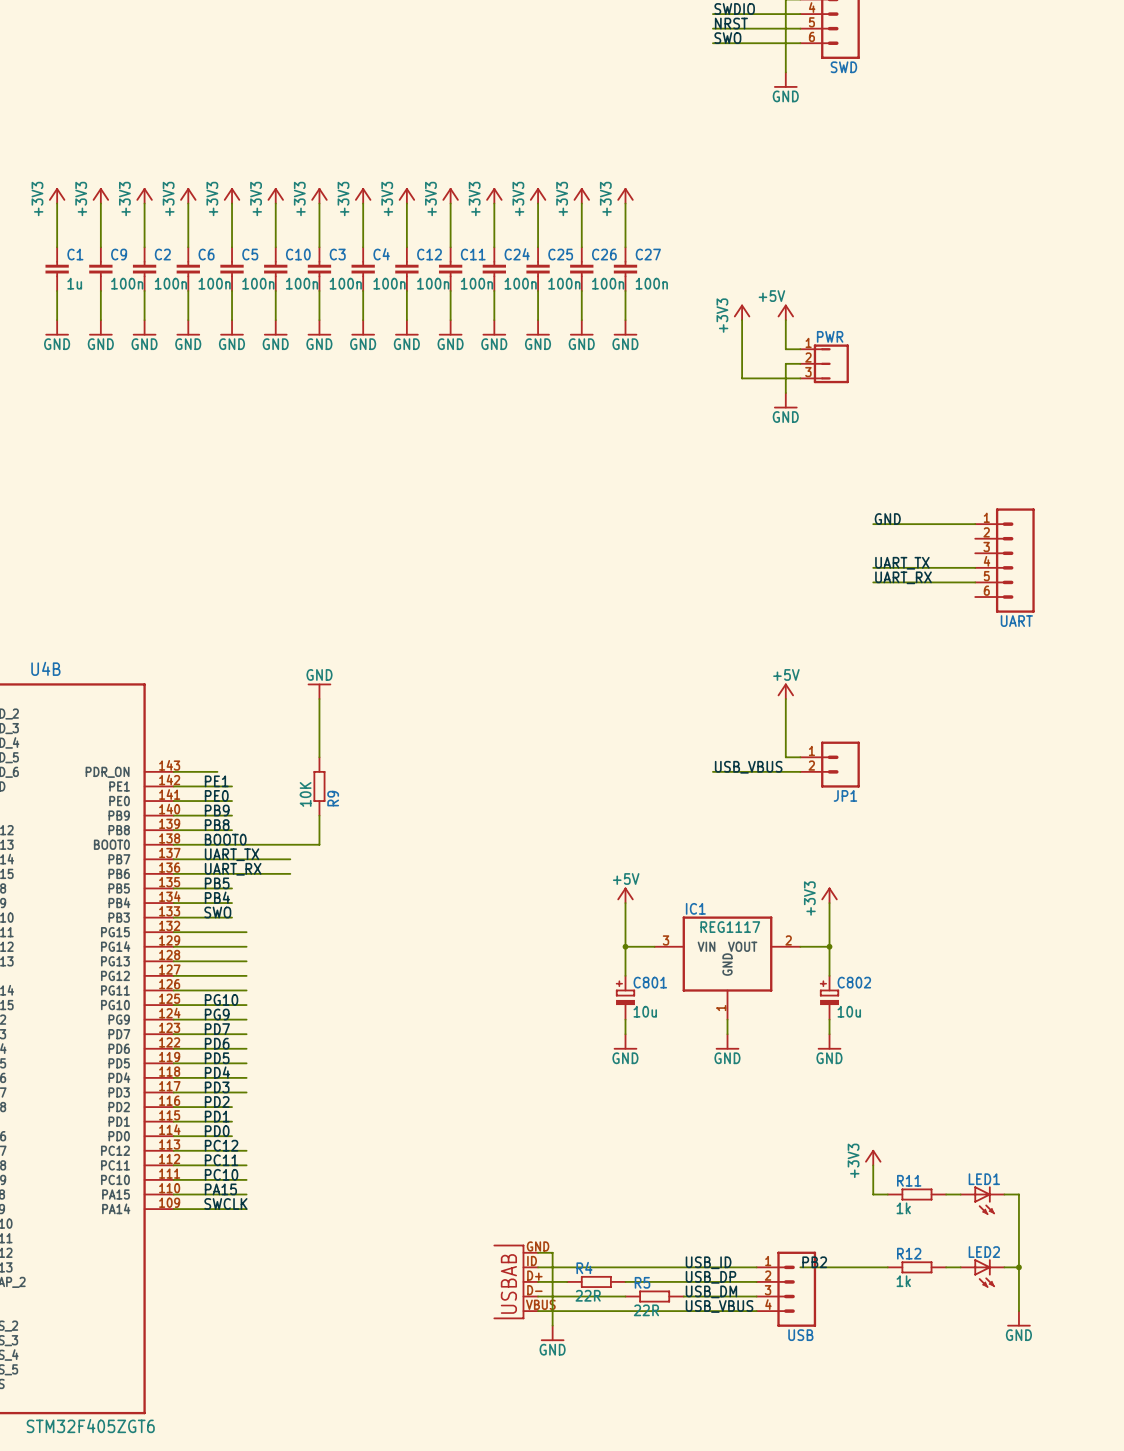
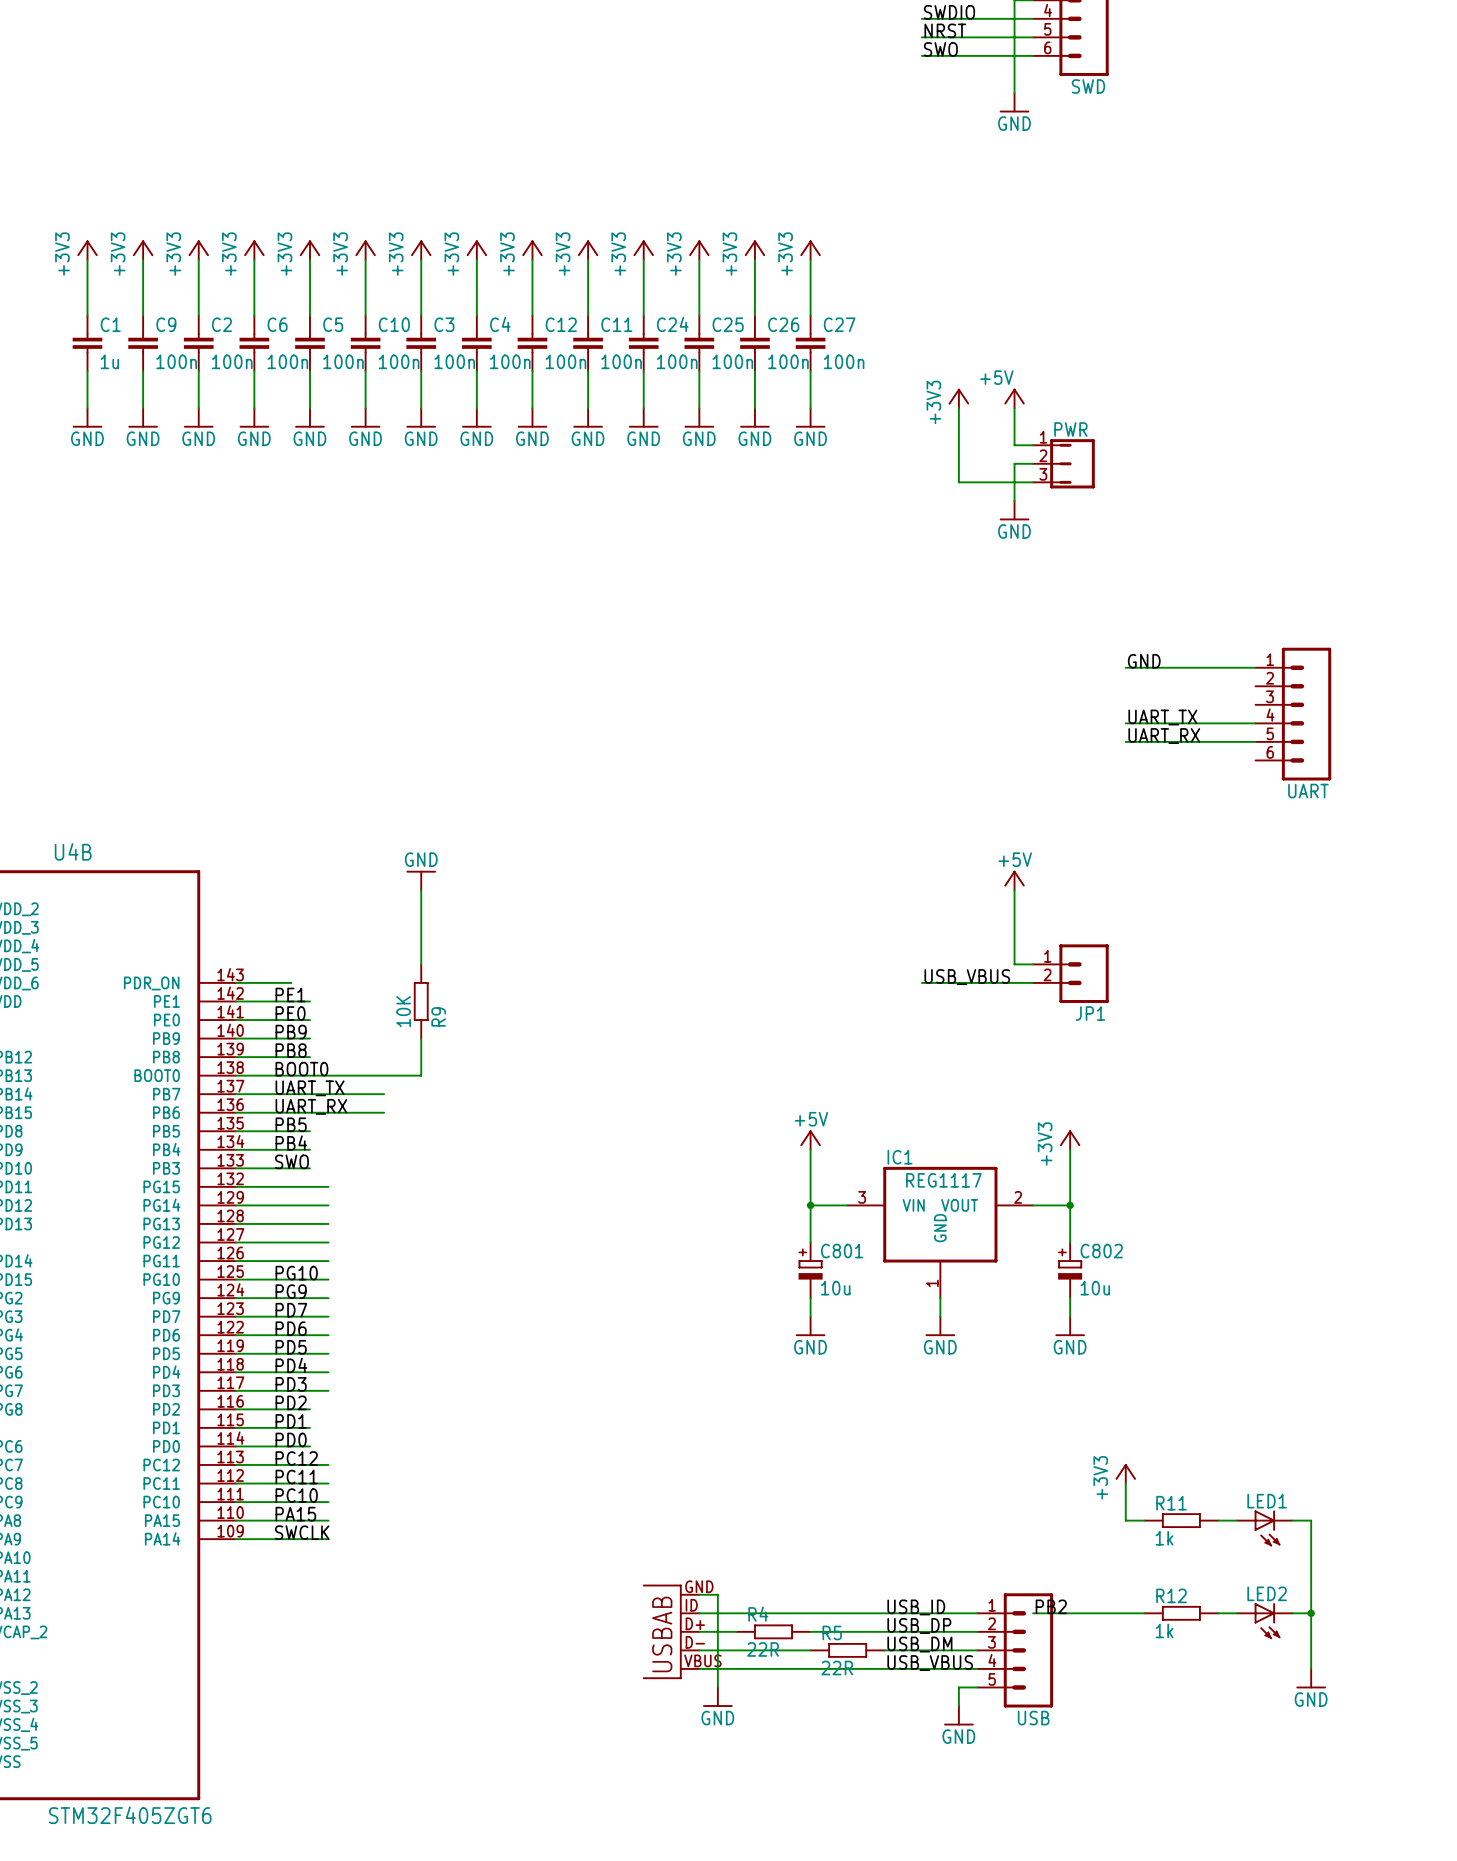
USB: (786, 1289) -> none
USB: none -> (1015, 1650)
wire: none -> (977, 1687) (958, 1687) (958, 1706)
power symbol: none -> GND (958, 1715)

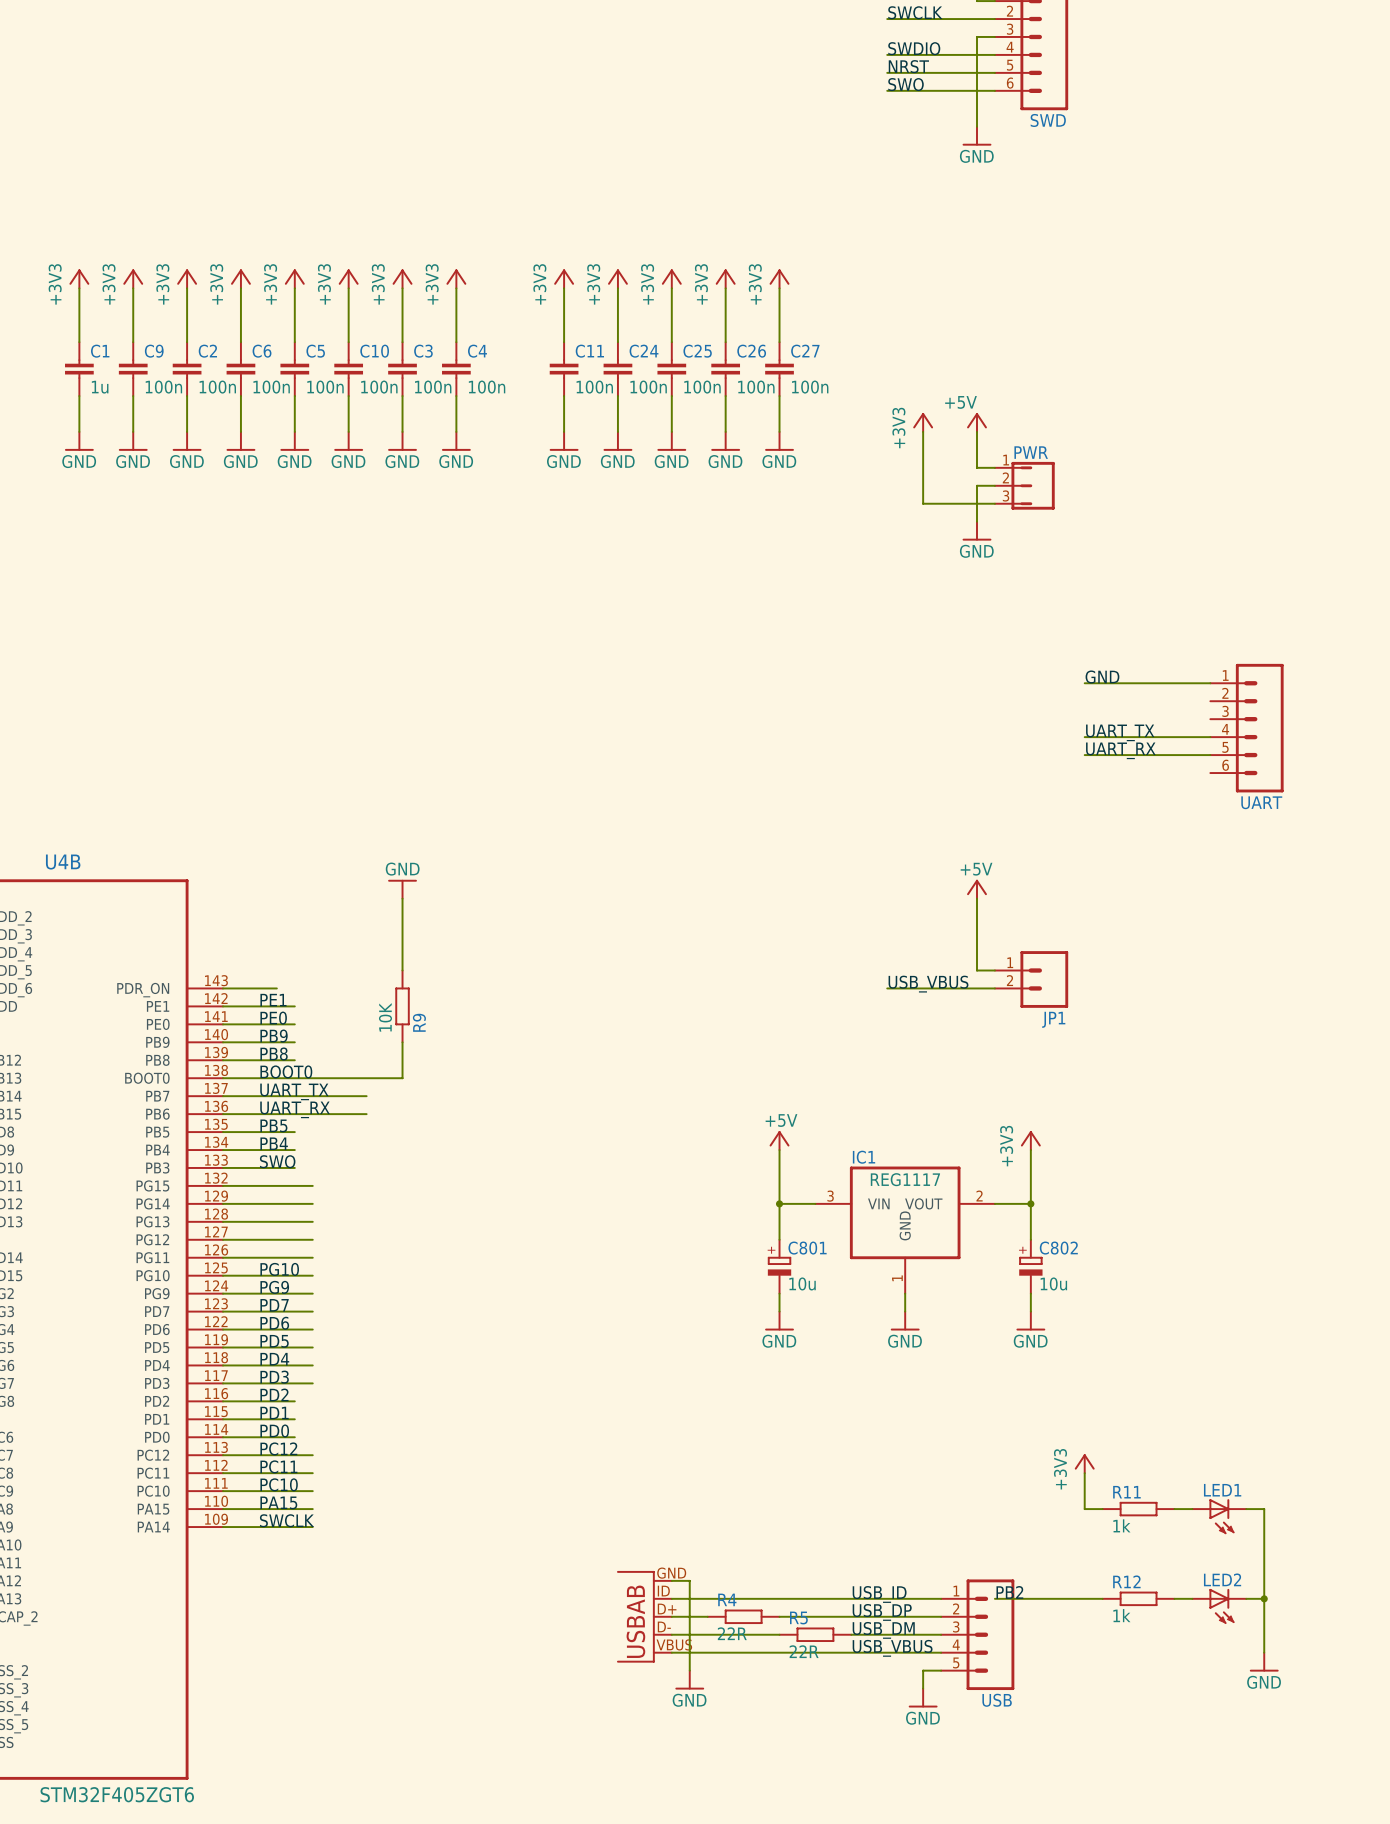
power symbol: +3V3 (532, 250) -> none
wire: (532, 259) (532, 315) -> none
C12: 100n (532, 343) -> none
wire: (532, 371) (532, 408) -> none
power symbol: GND (532, 417) -> none

